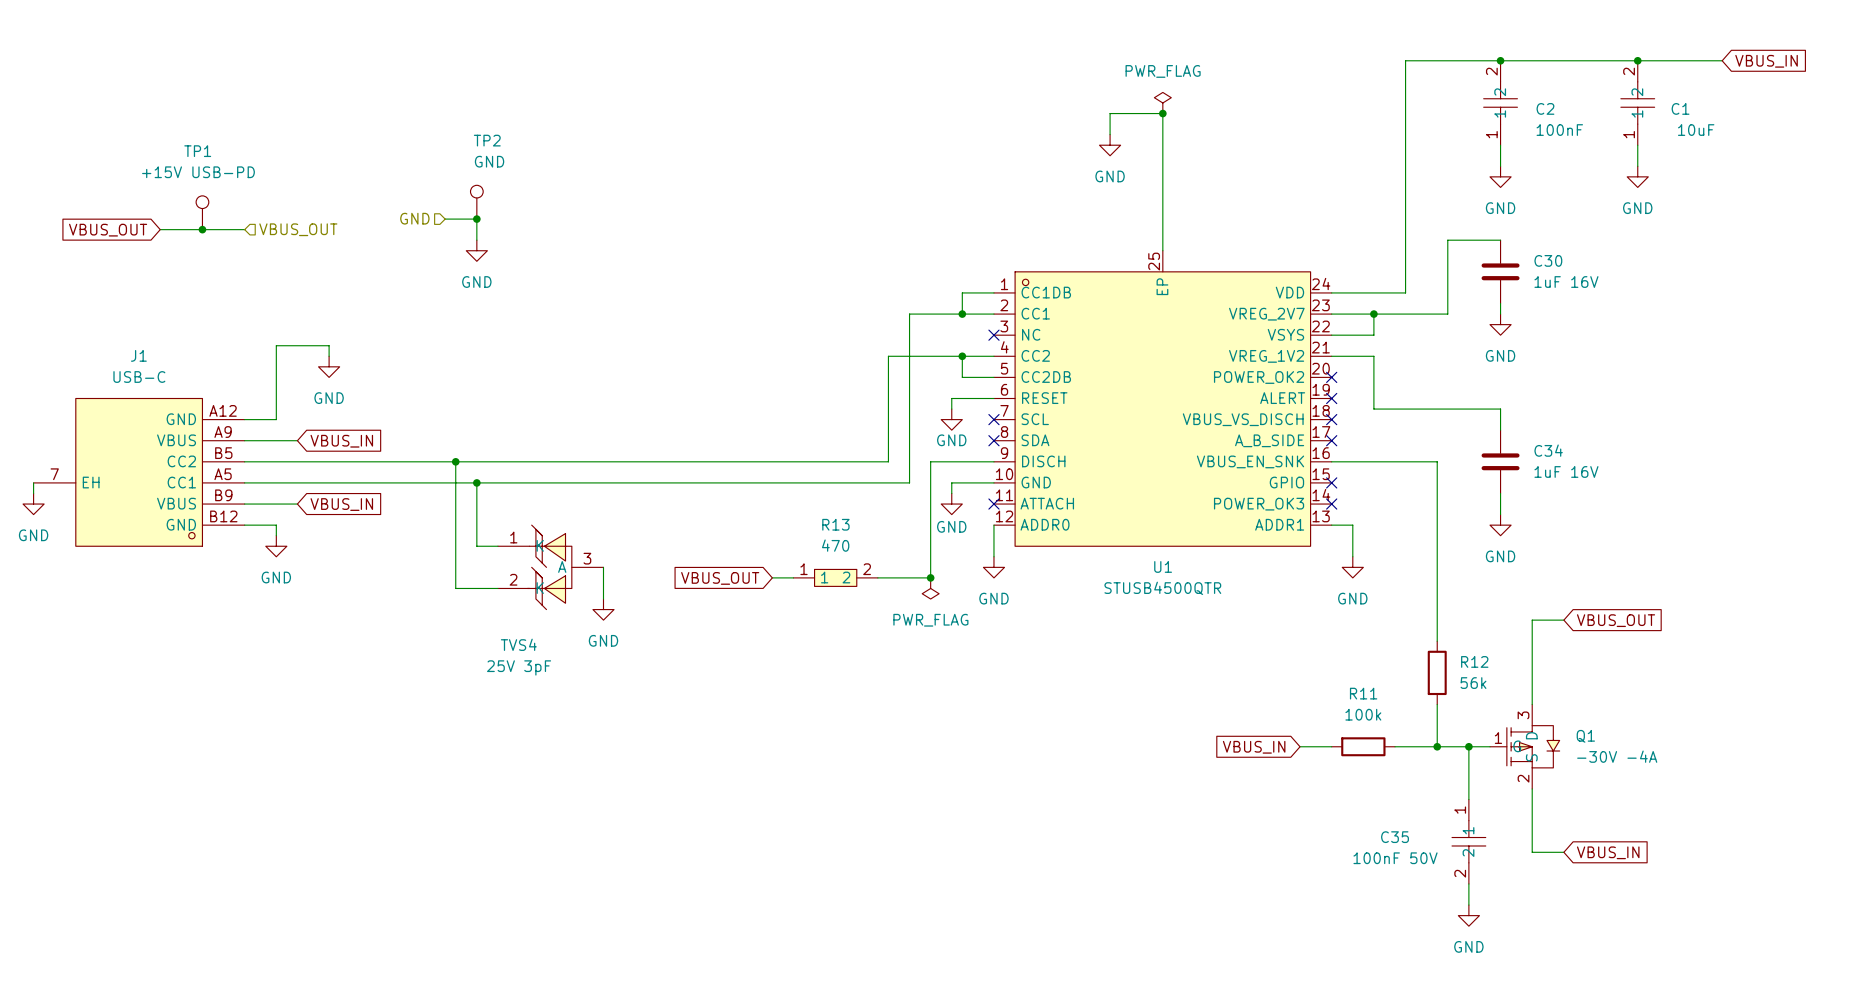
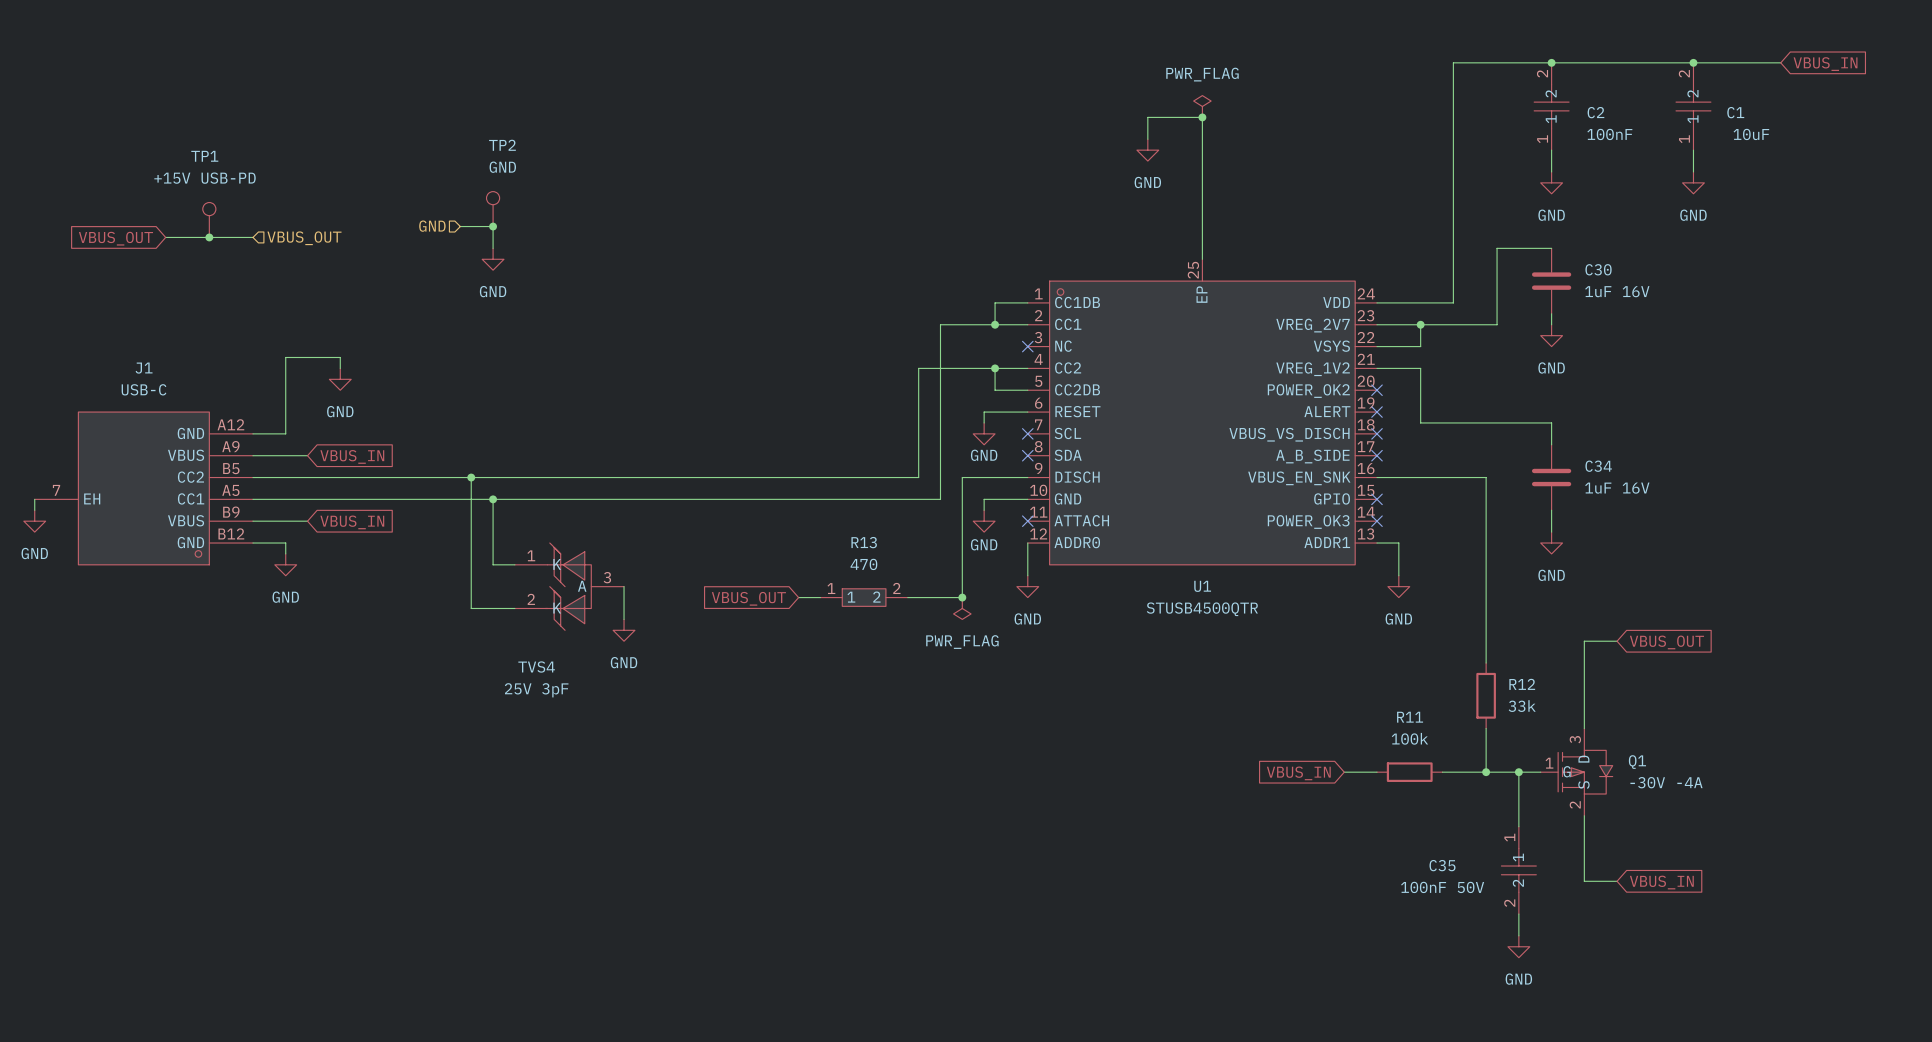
R12 value: 56k (1473, 683) -> 33k (1522, 706)

